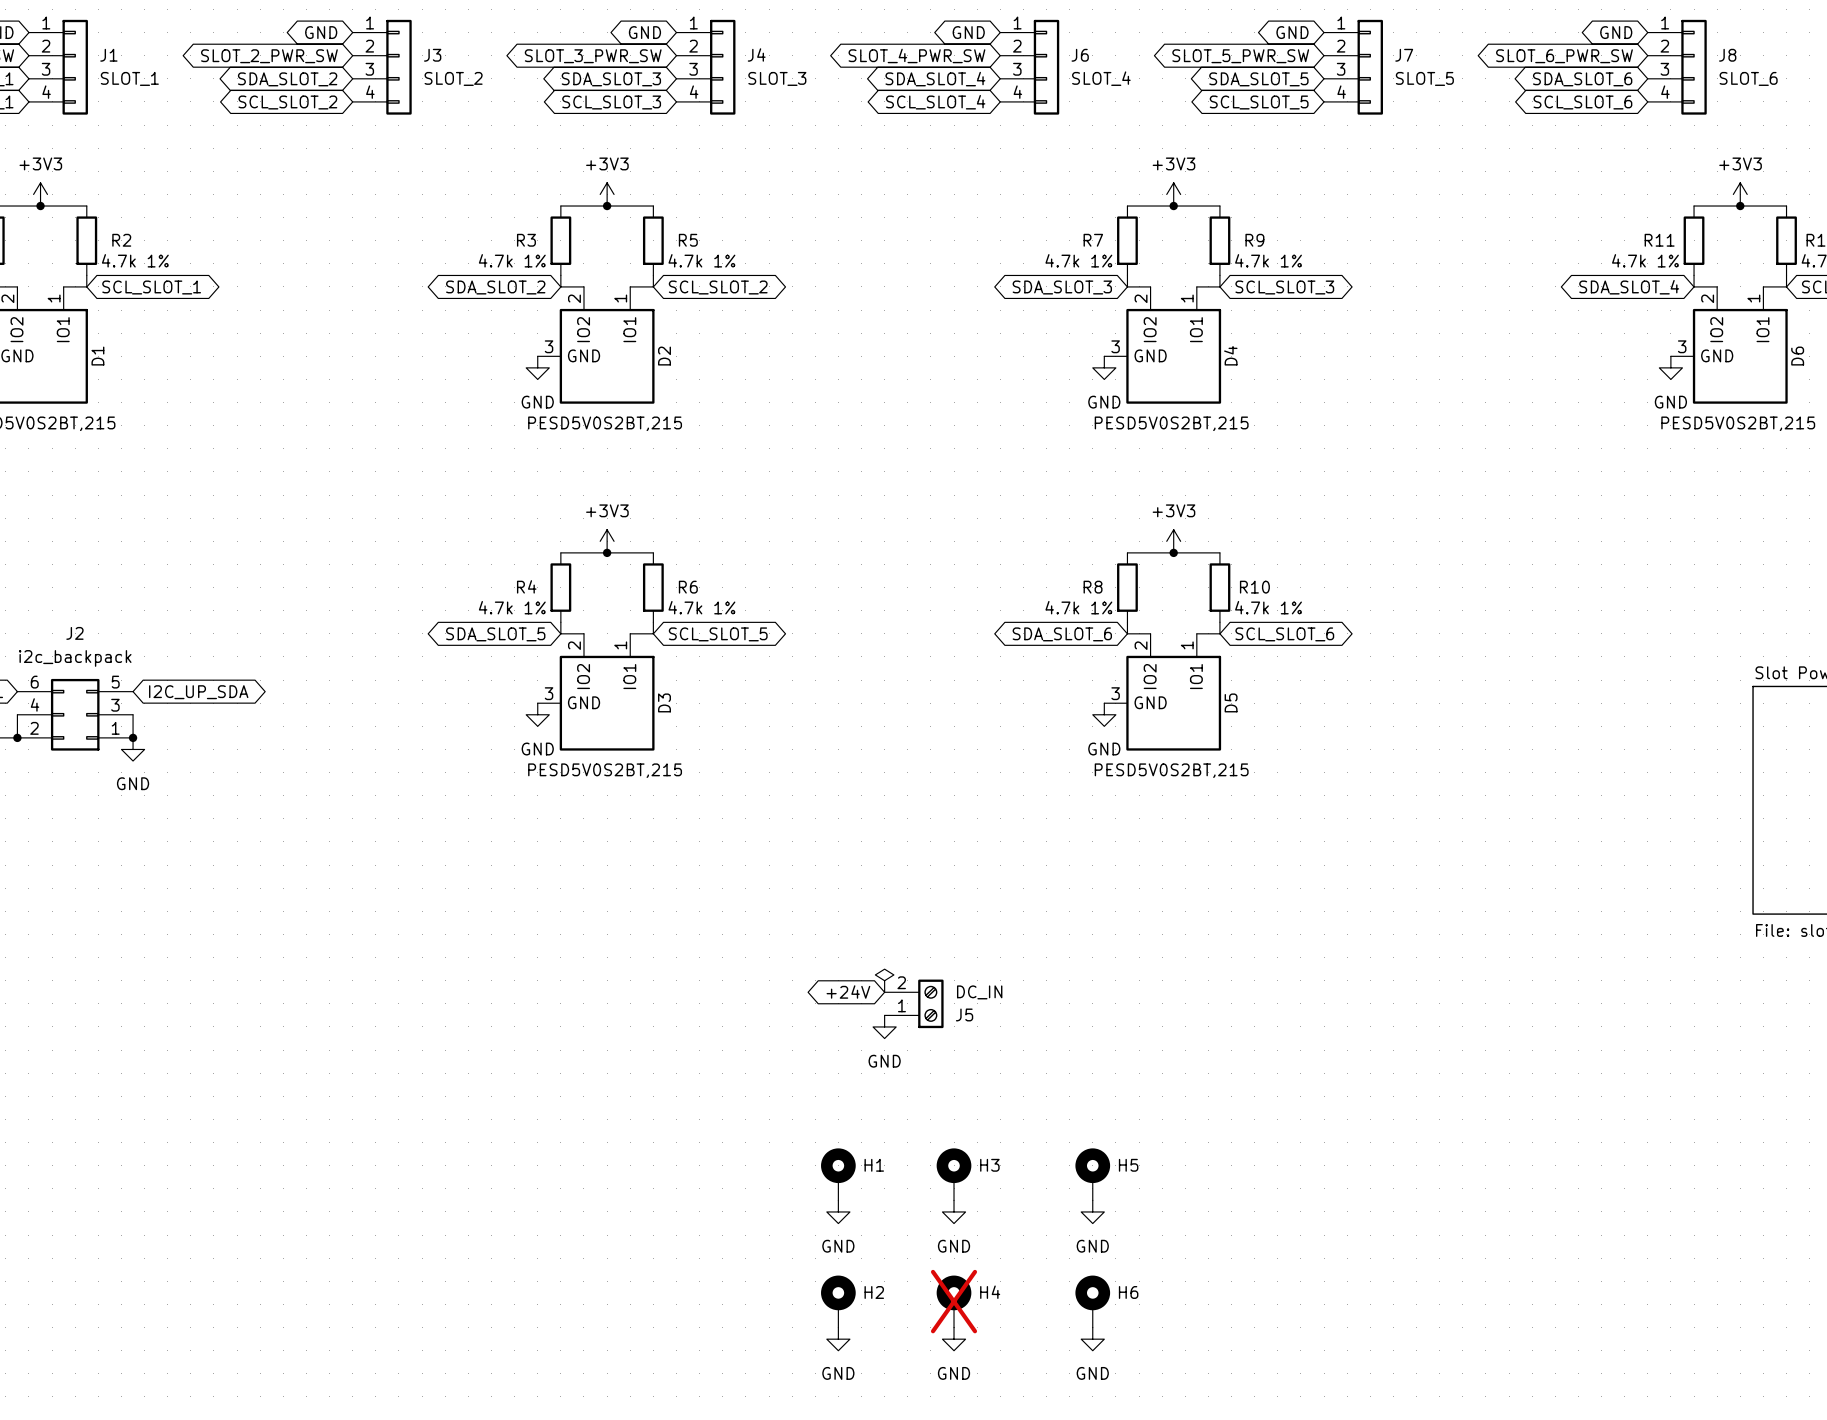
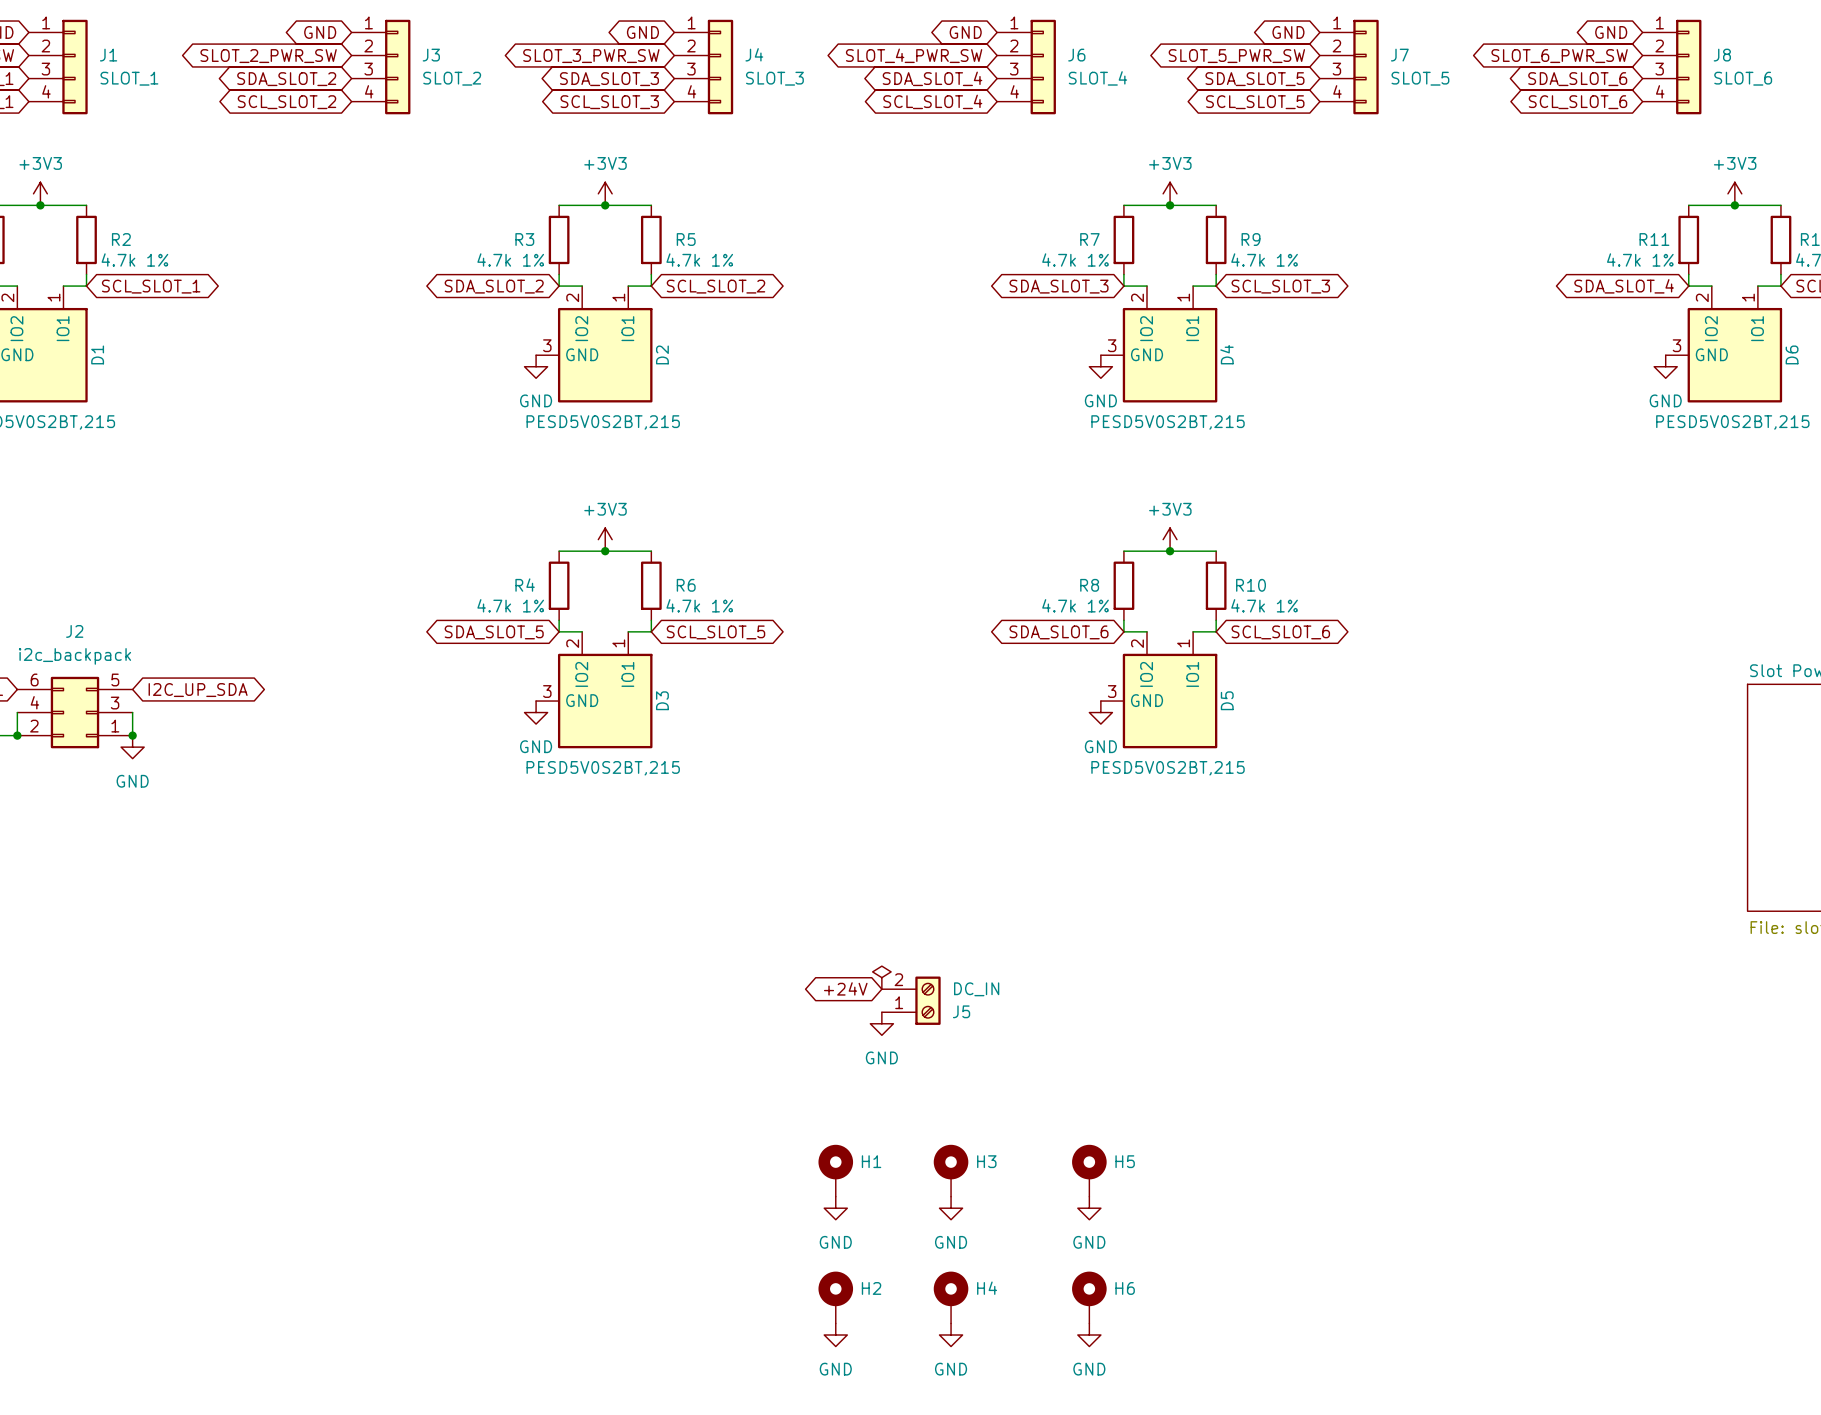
H4 do-not-place cross: (954, 1301) -> none

